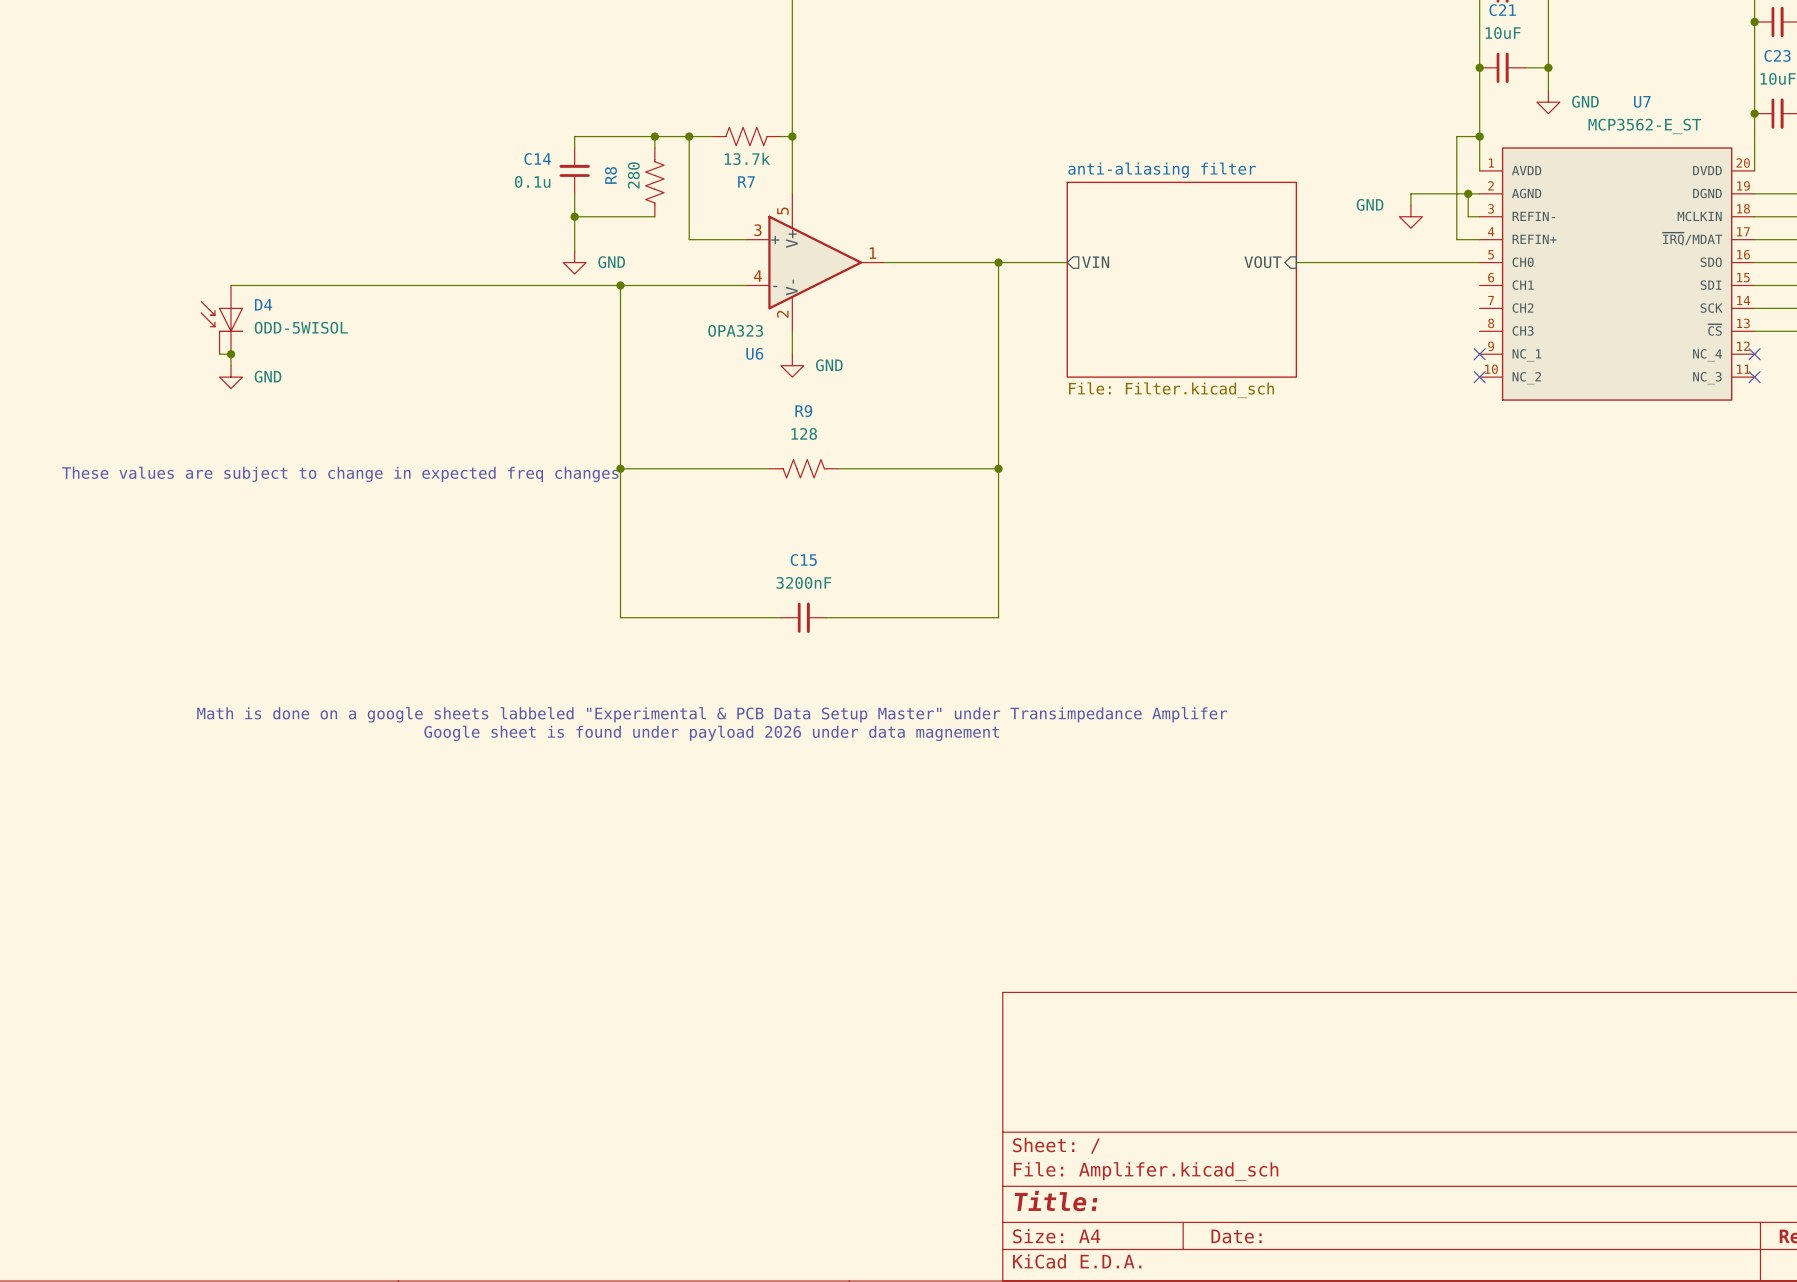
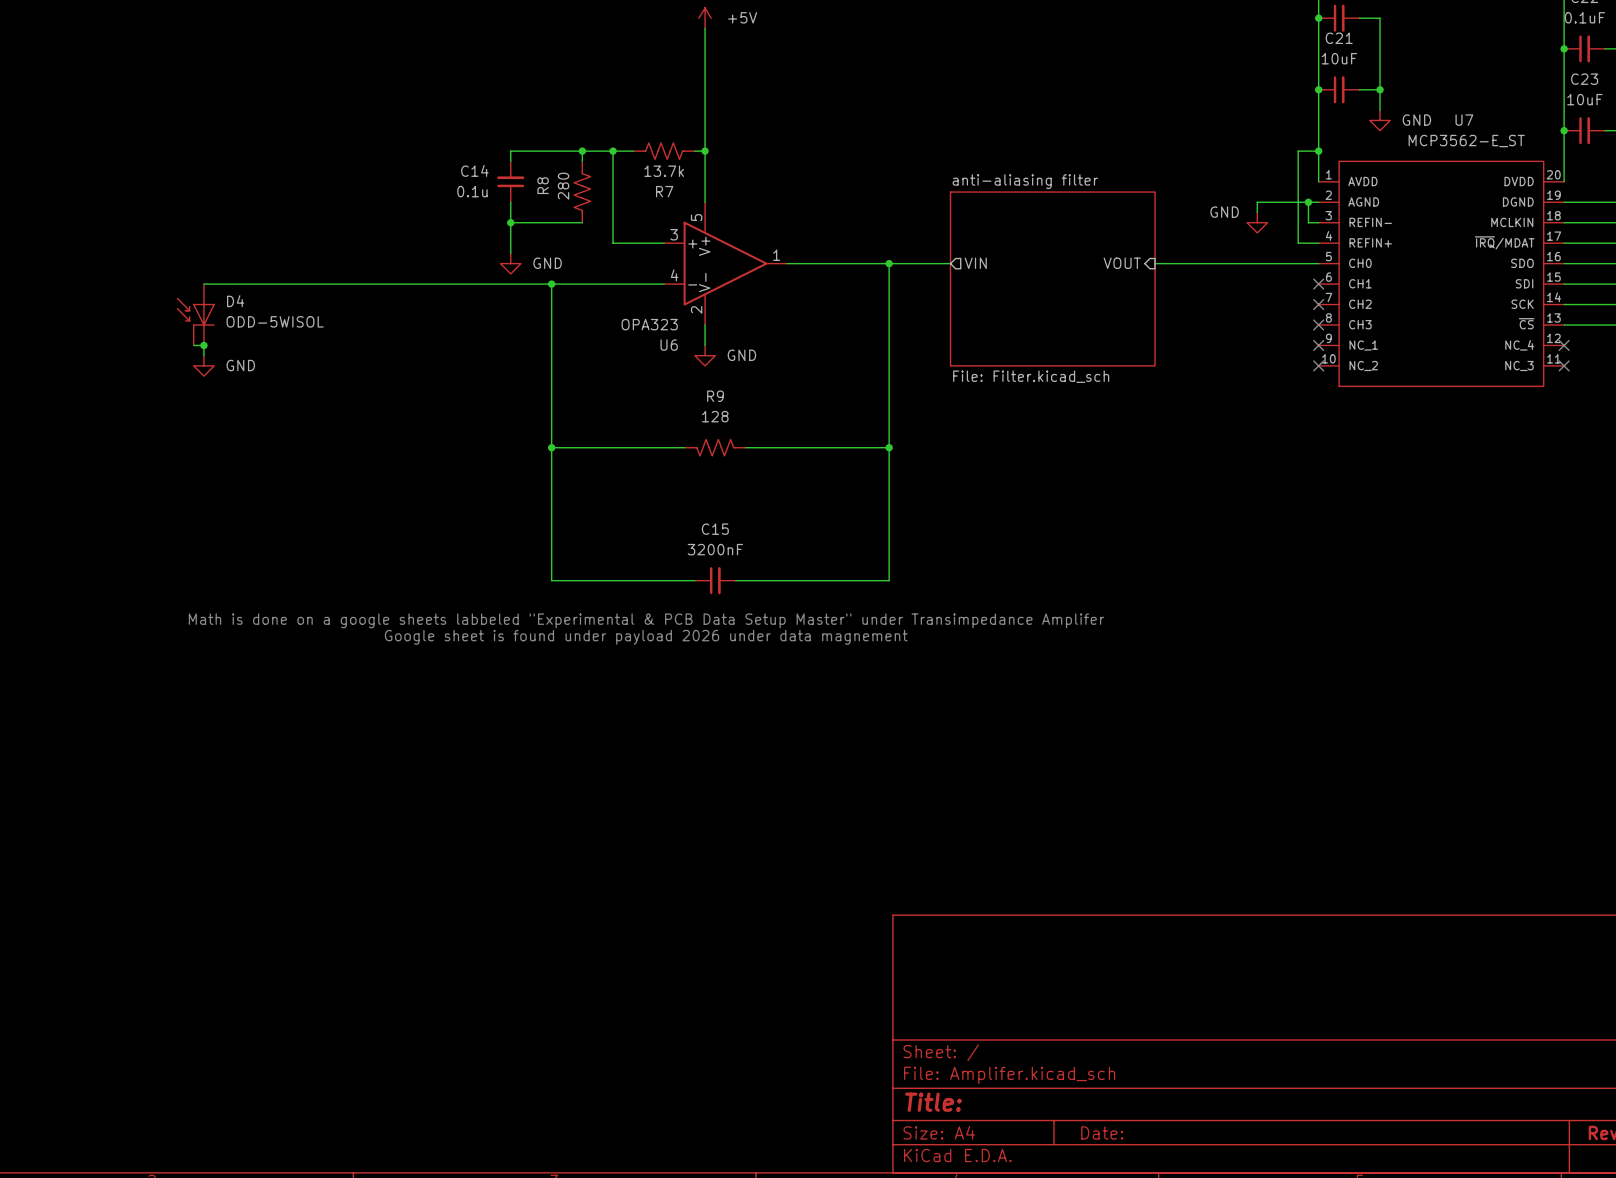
no-connect mark: none -> (1318, 284)
no-connect mark: none -> (1318, 304)
no-connect mark: none -> (1318, 325)
text: These values are subject to change in expected freq changes (340, 474) -> none
text position: Math is done on a google sheets labbeled "Experimental & PCB Data Setup Master" under Transimpedance Amplifer (712, 714) -> Math is done on a google sheets labbeled "Experimental & PCB Data Setup Master" under Transimpedance Amplifer (646, 620)
text position: Google sheet is found under payload 2026 under data magnement (711, 733) -> Google sheet is found under payload 2026 under data magnement (646, 637)

